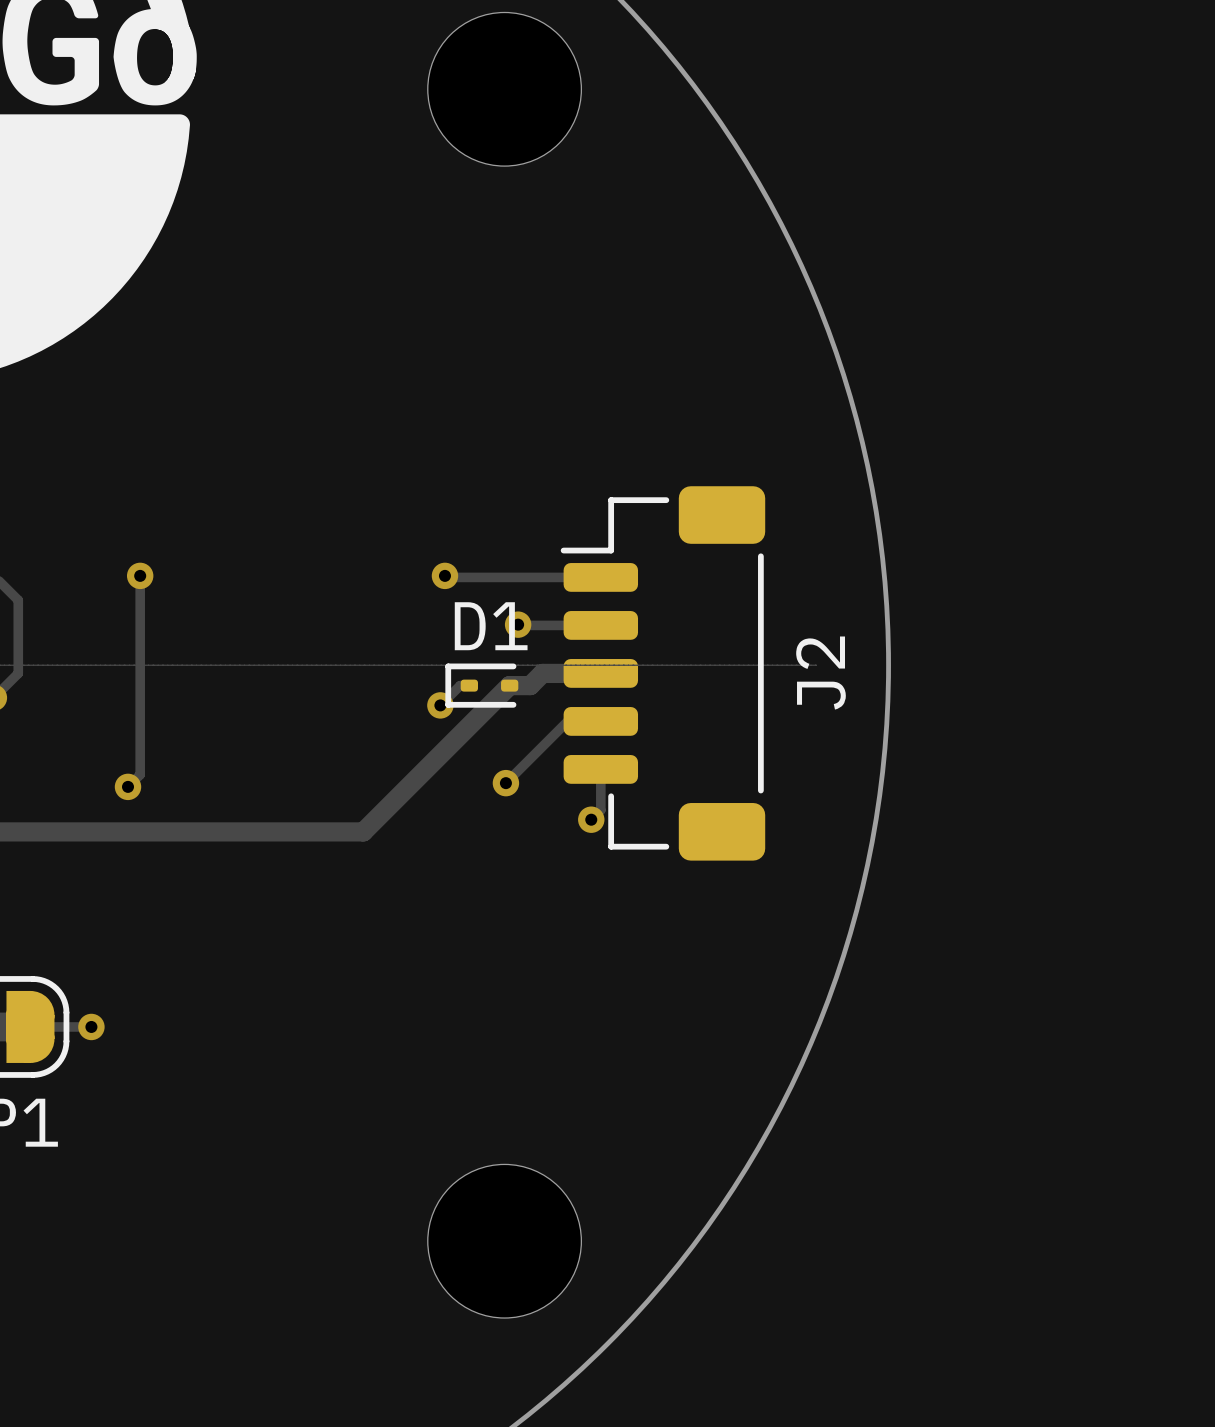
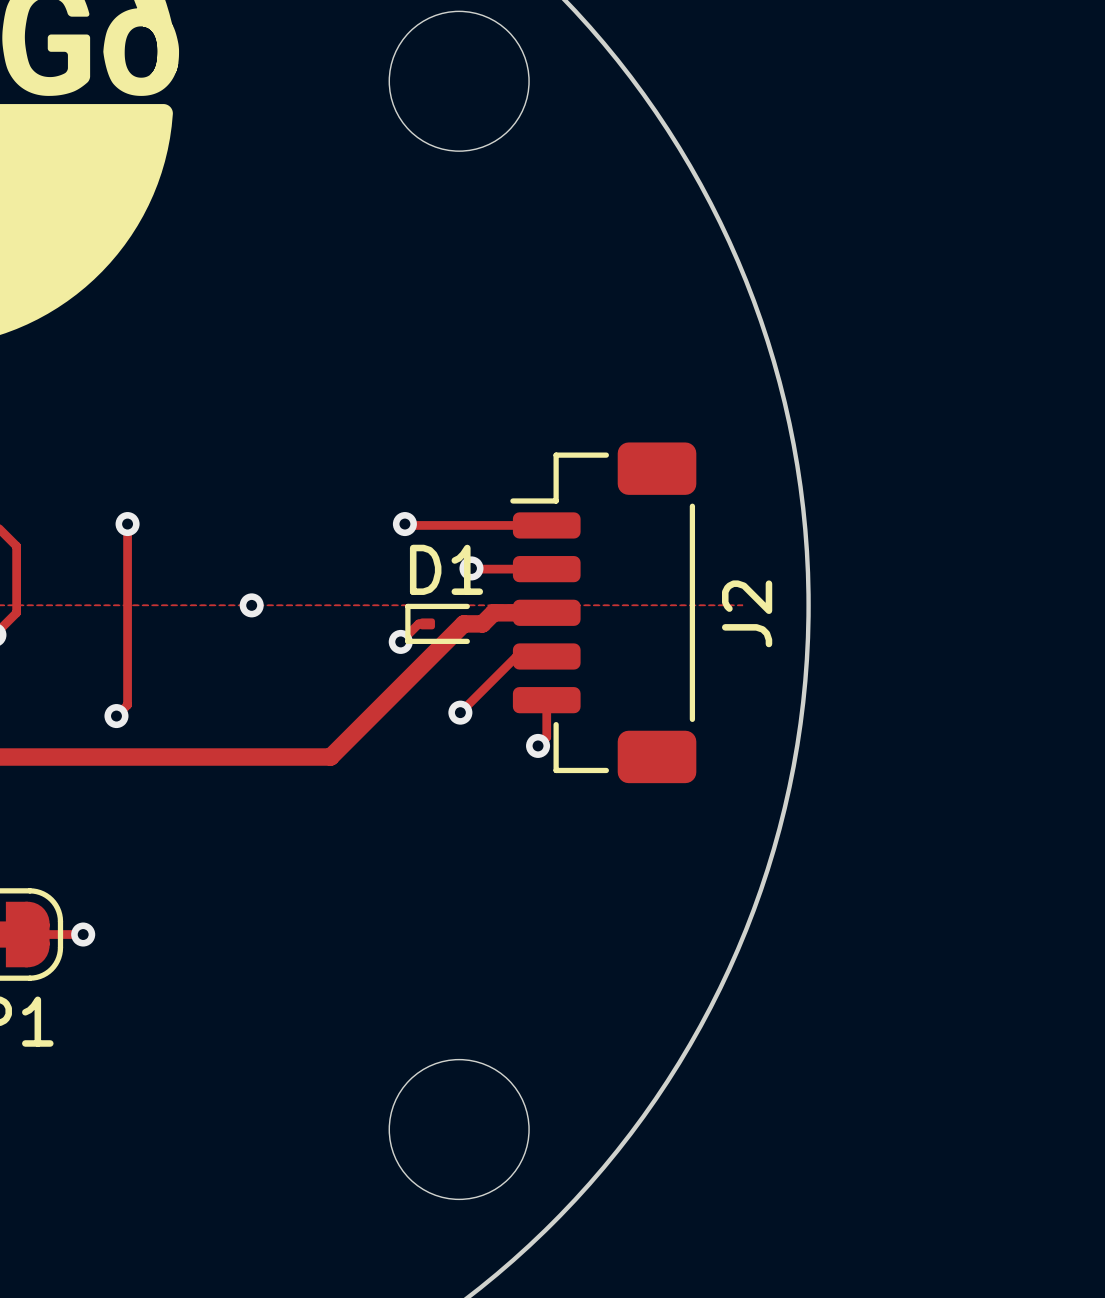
via: none -> (251, 605)

